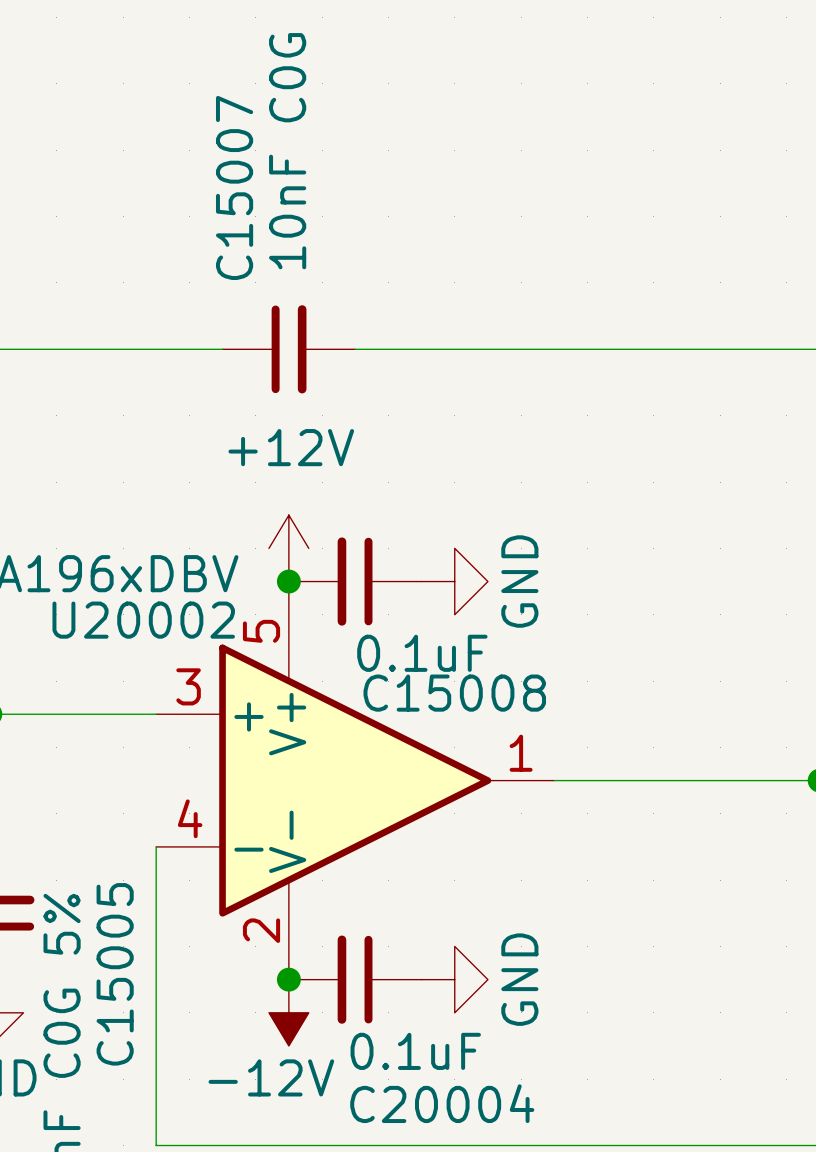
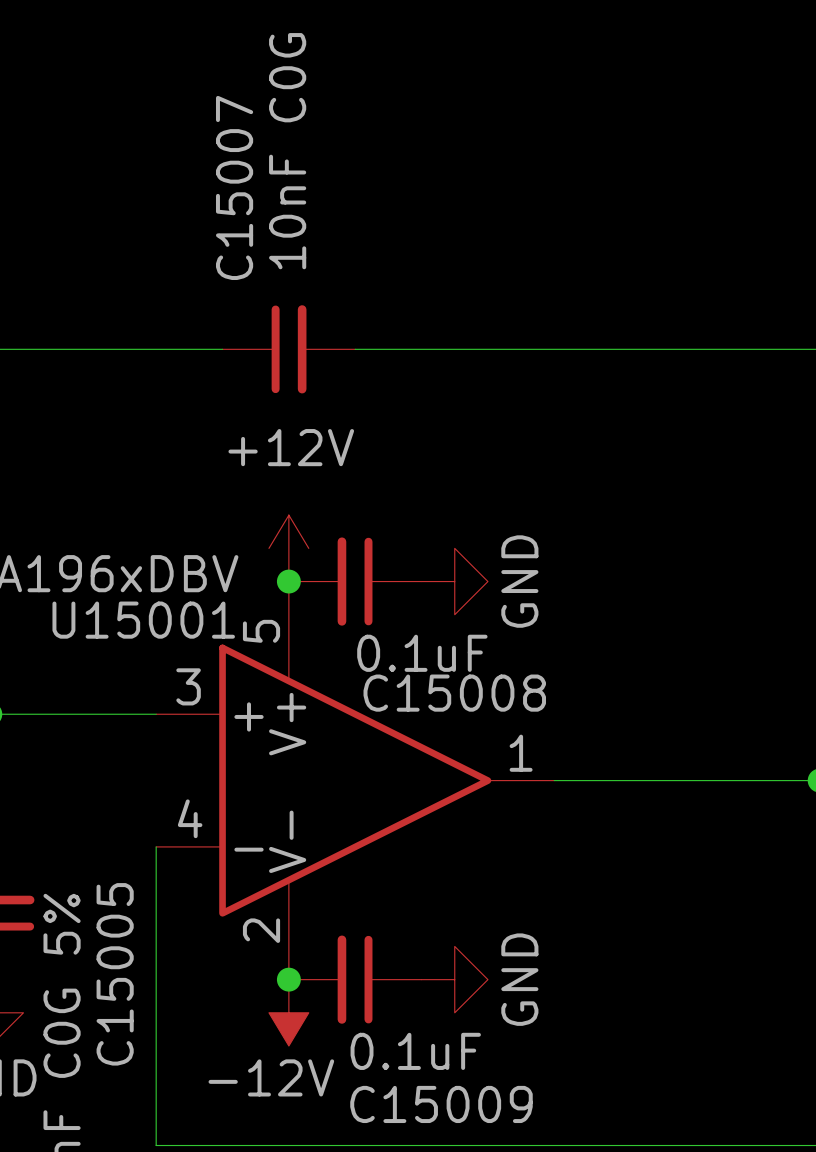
U20002 name: U20002 (143, 620) -> U15001 (143, 620)
C20004 name: C20004 (442, 1103) -> C15009 (441, 1104)

